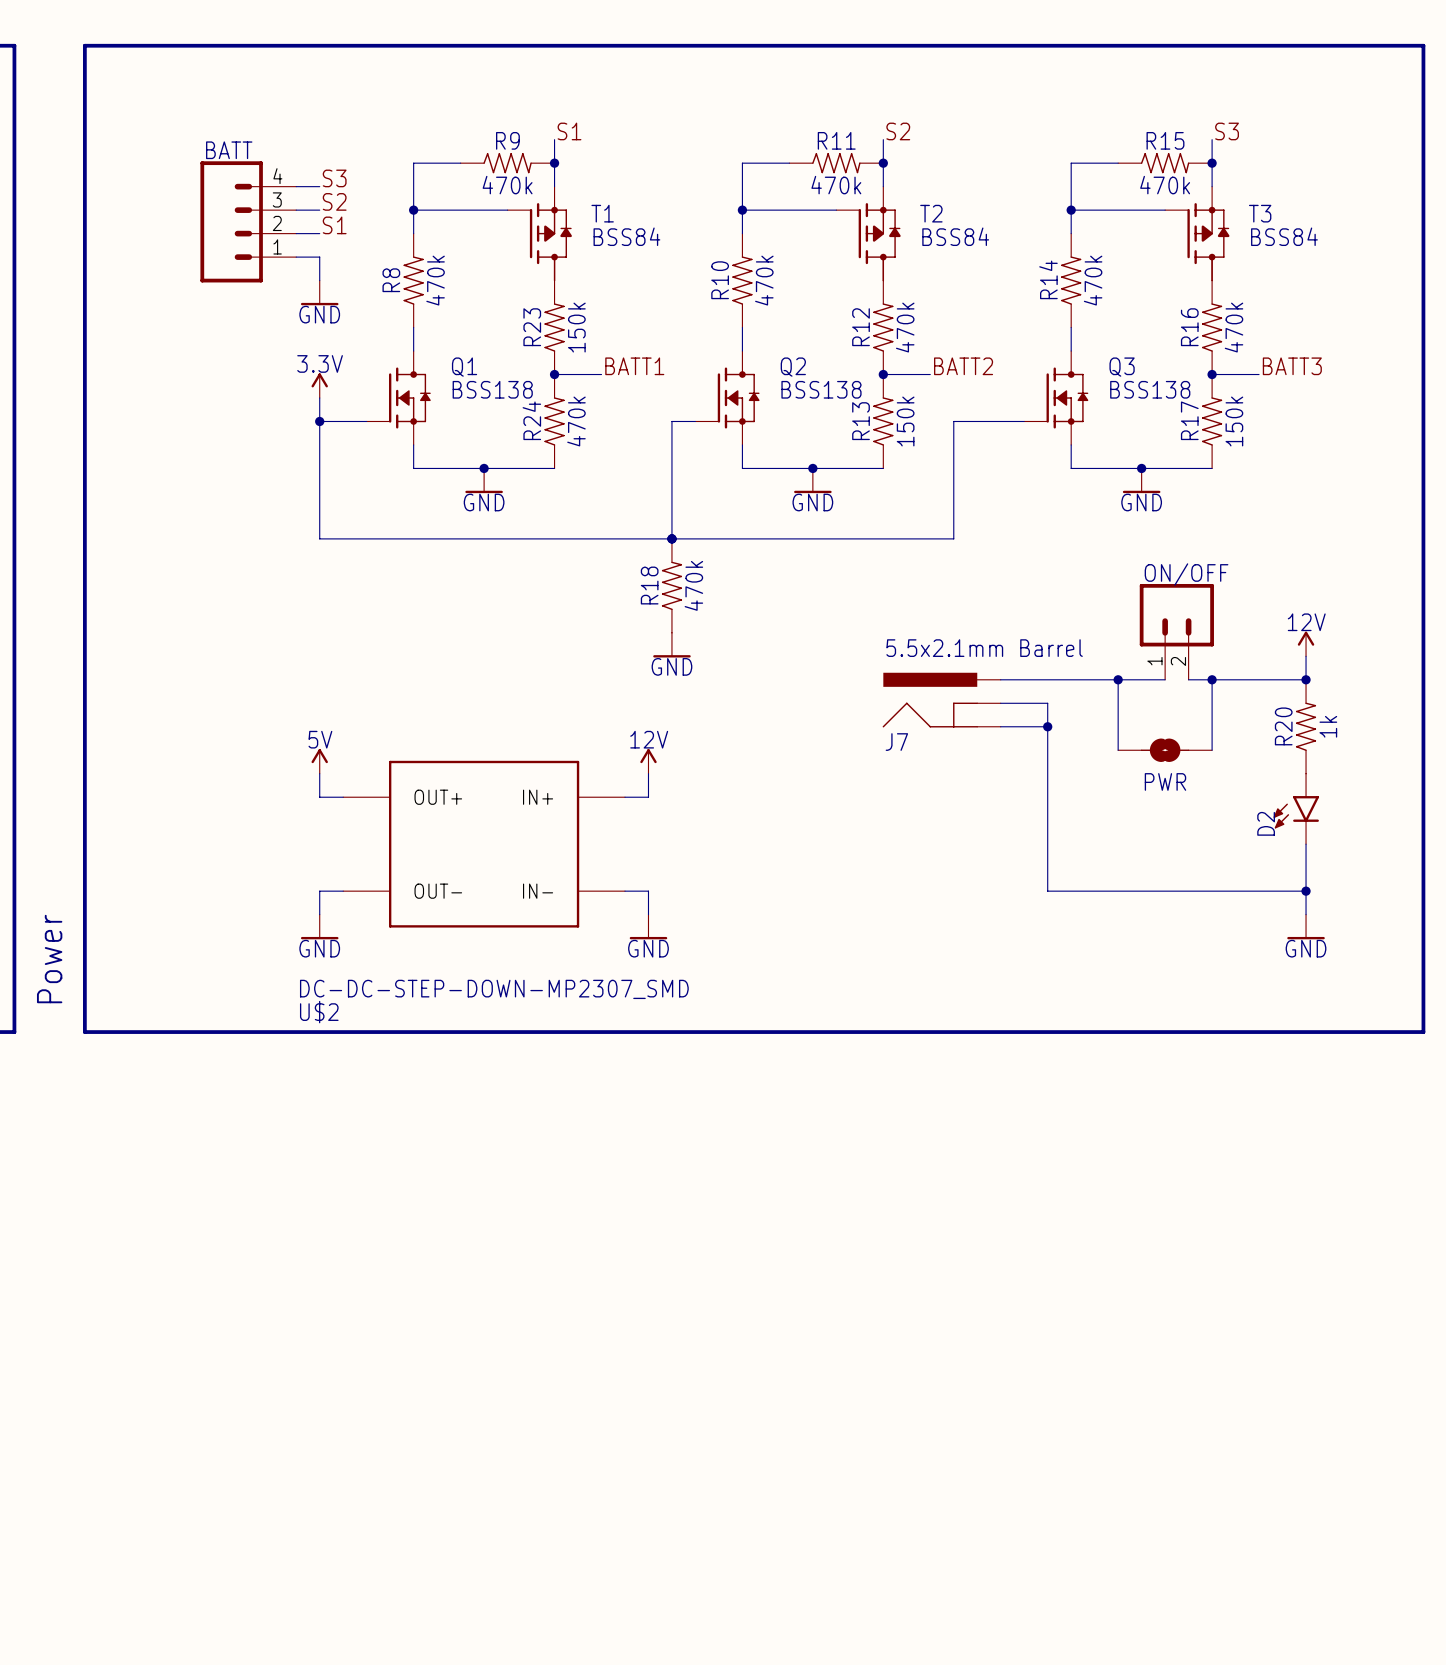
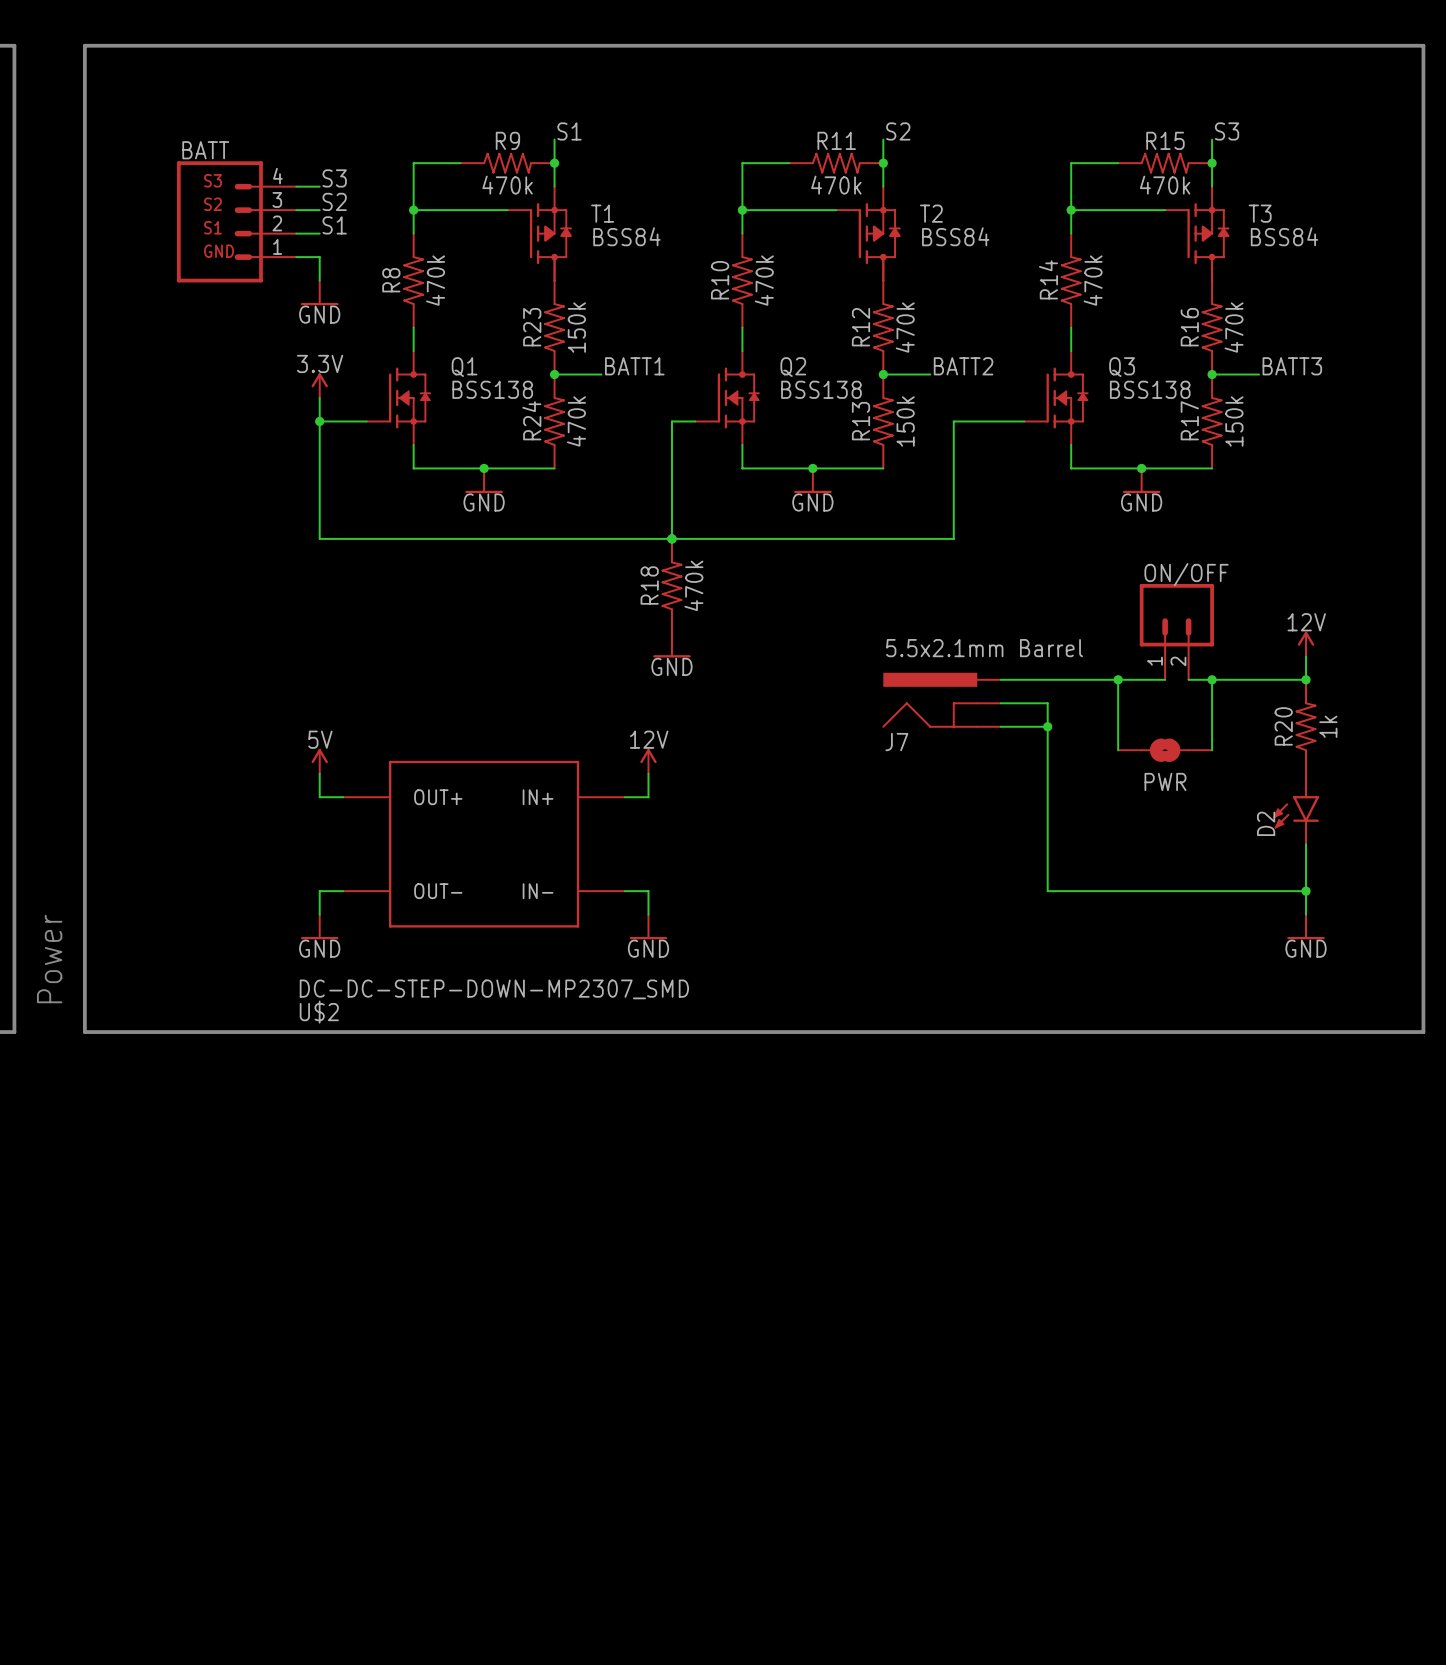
BATT: none -> (236, 221)
BATT: (248, 221) -> none

